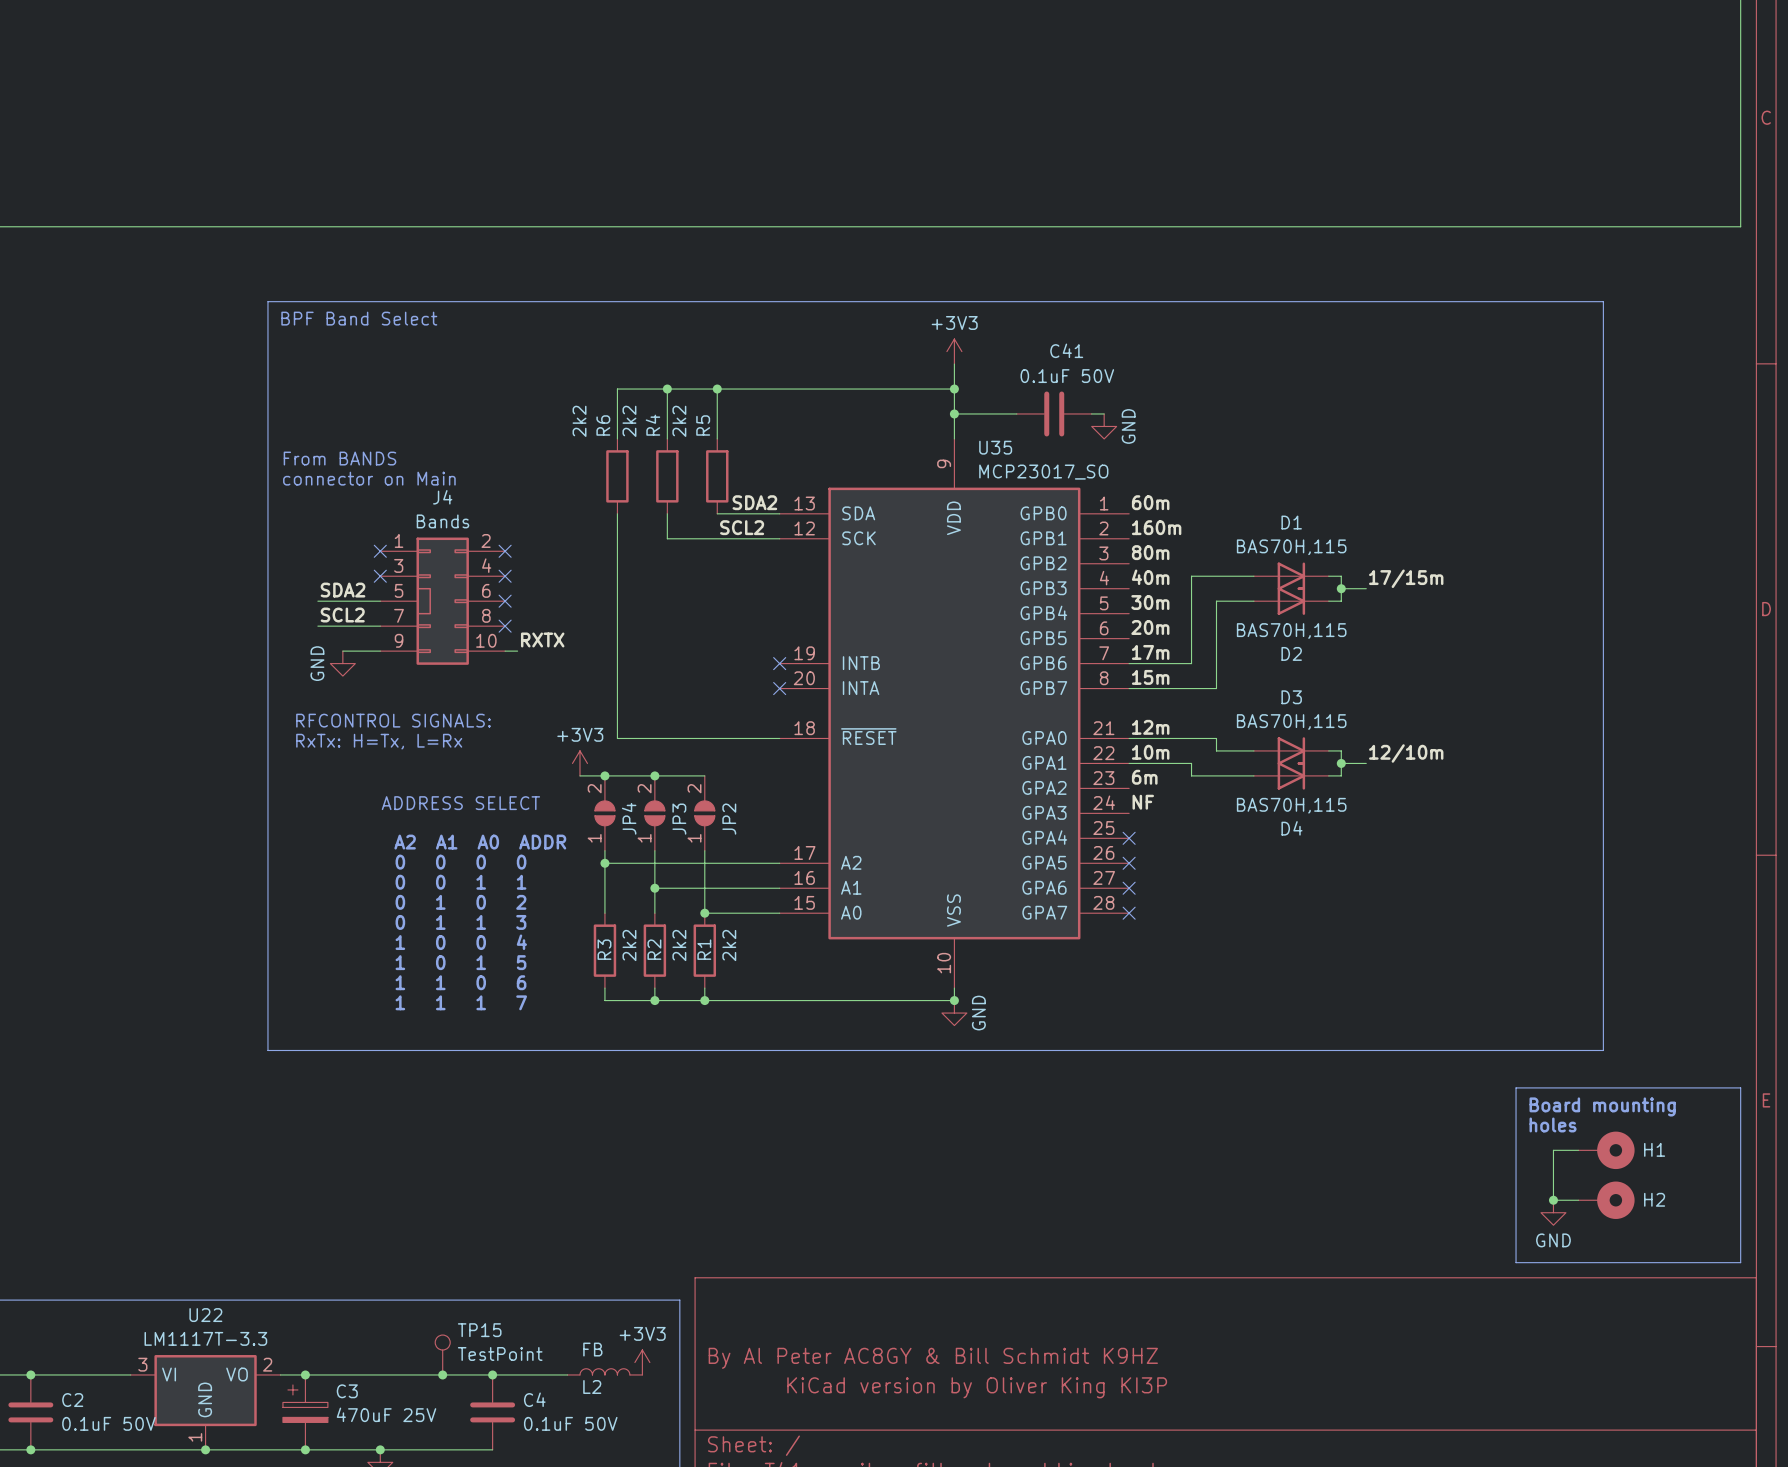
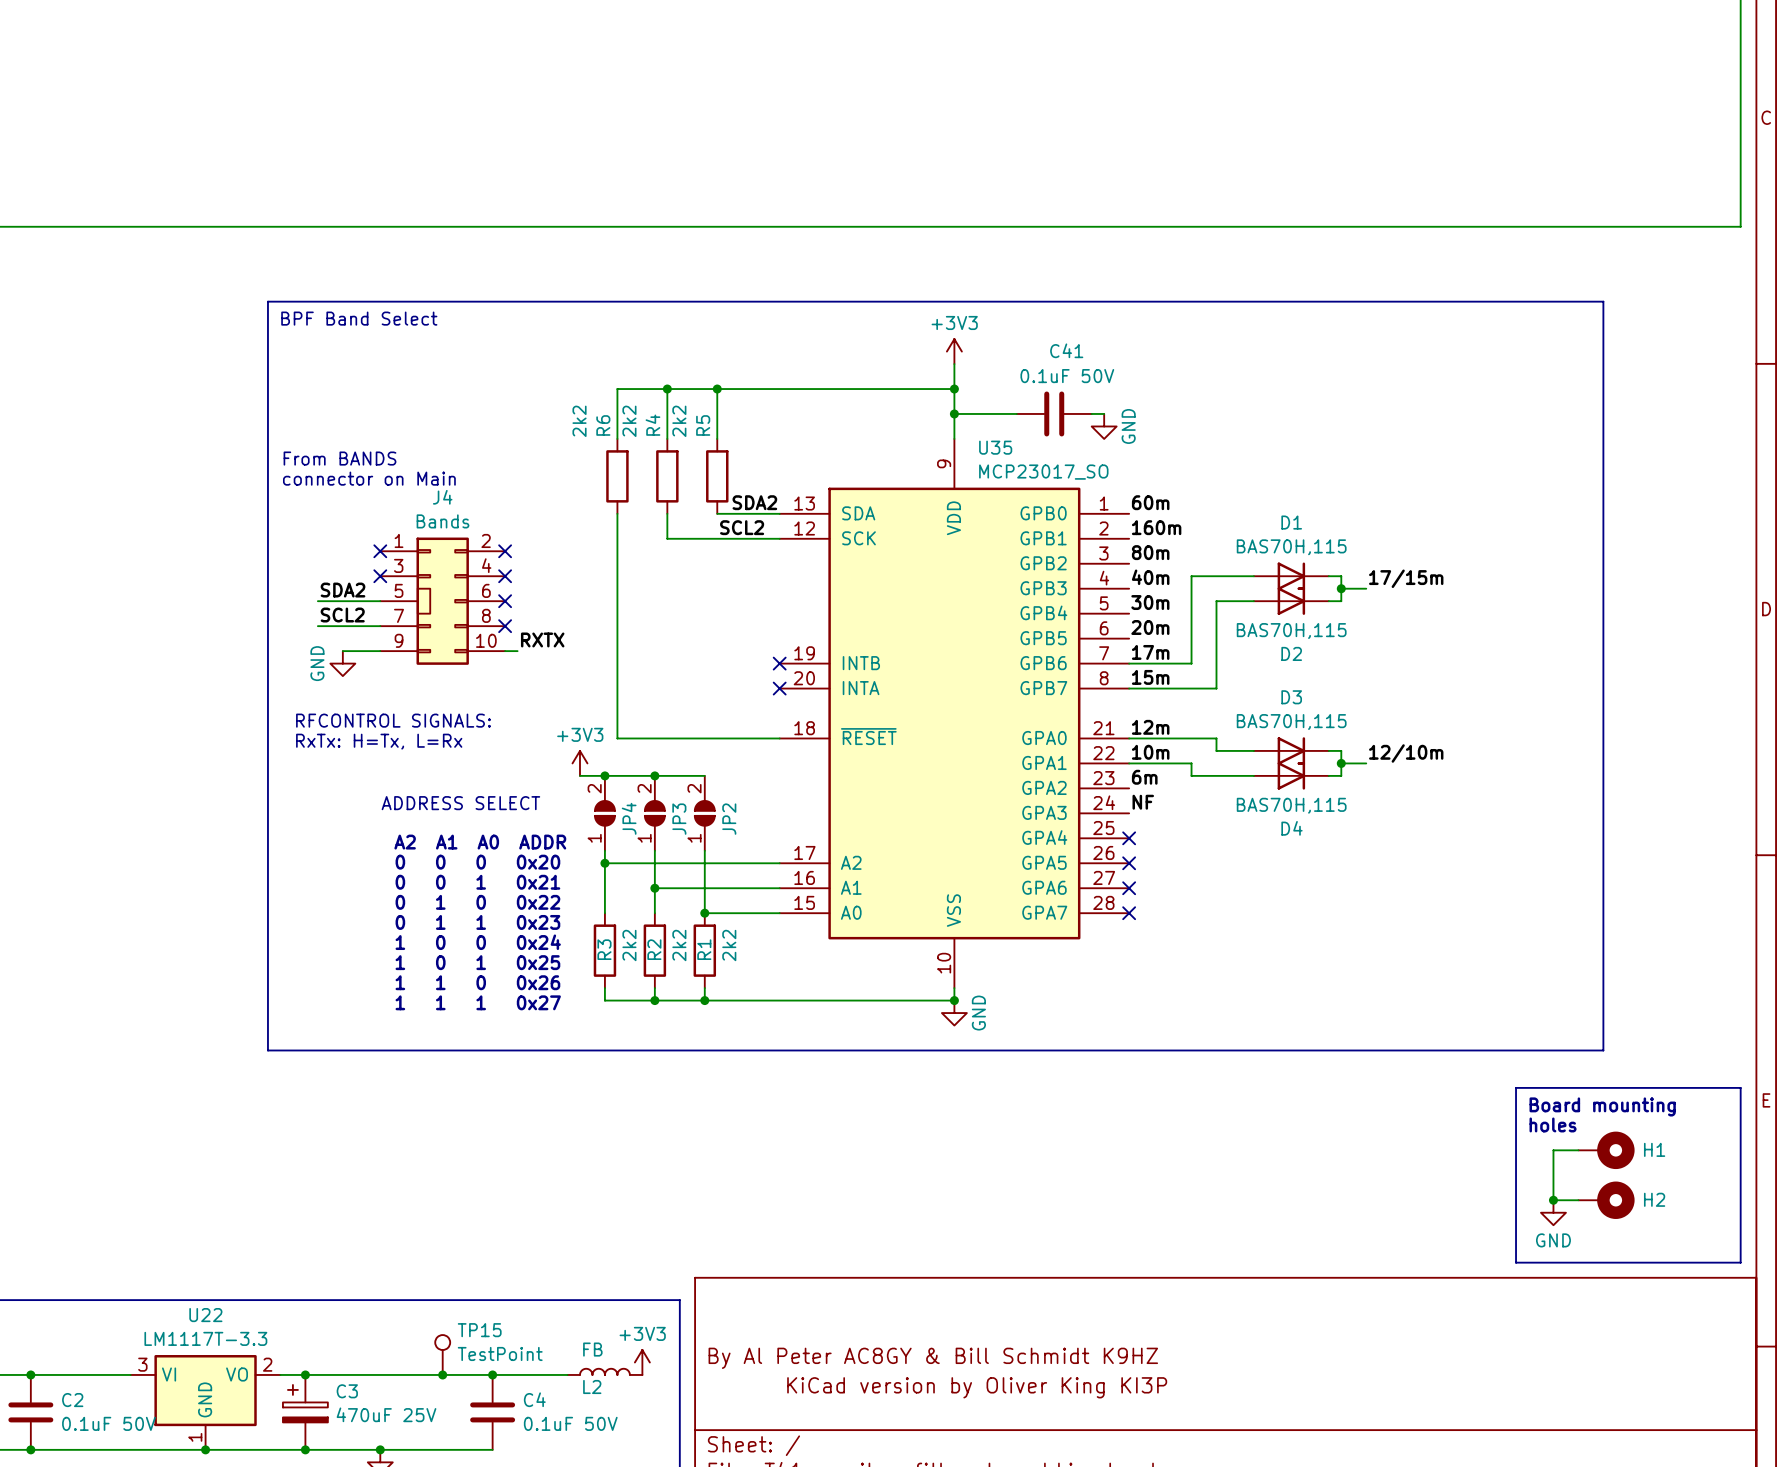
text: 0 0 0 0 (460, 862) -> 0 0 0 0x20 (477, 862)
text: 0 0 1 1 (460, 882) -> 0 0 1 0x21 (477, 882)
text: 0 1 0 2 (460, 902) -> 0 1 0 0x22 (477, 902)
text: 0 1 1 3 (460, 922) -> 0 1 1 0x23 (477, 922)
text: 1 0 0 4 (461, 942) -> 1 0 0 0x24 (478, 942)
text: 1 0 1 5 (460, 962) -> 1 0 1 0x25 (477, 962)
text: 1 1 0 6 (460, 982) -> 1 1 0 0x26 (477, 982)
text: 1 1 1 7 (461, 1002) -> 1 1 1 0x27 (478, 1002)

